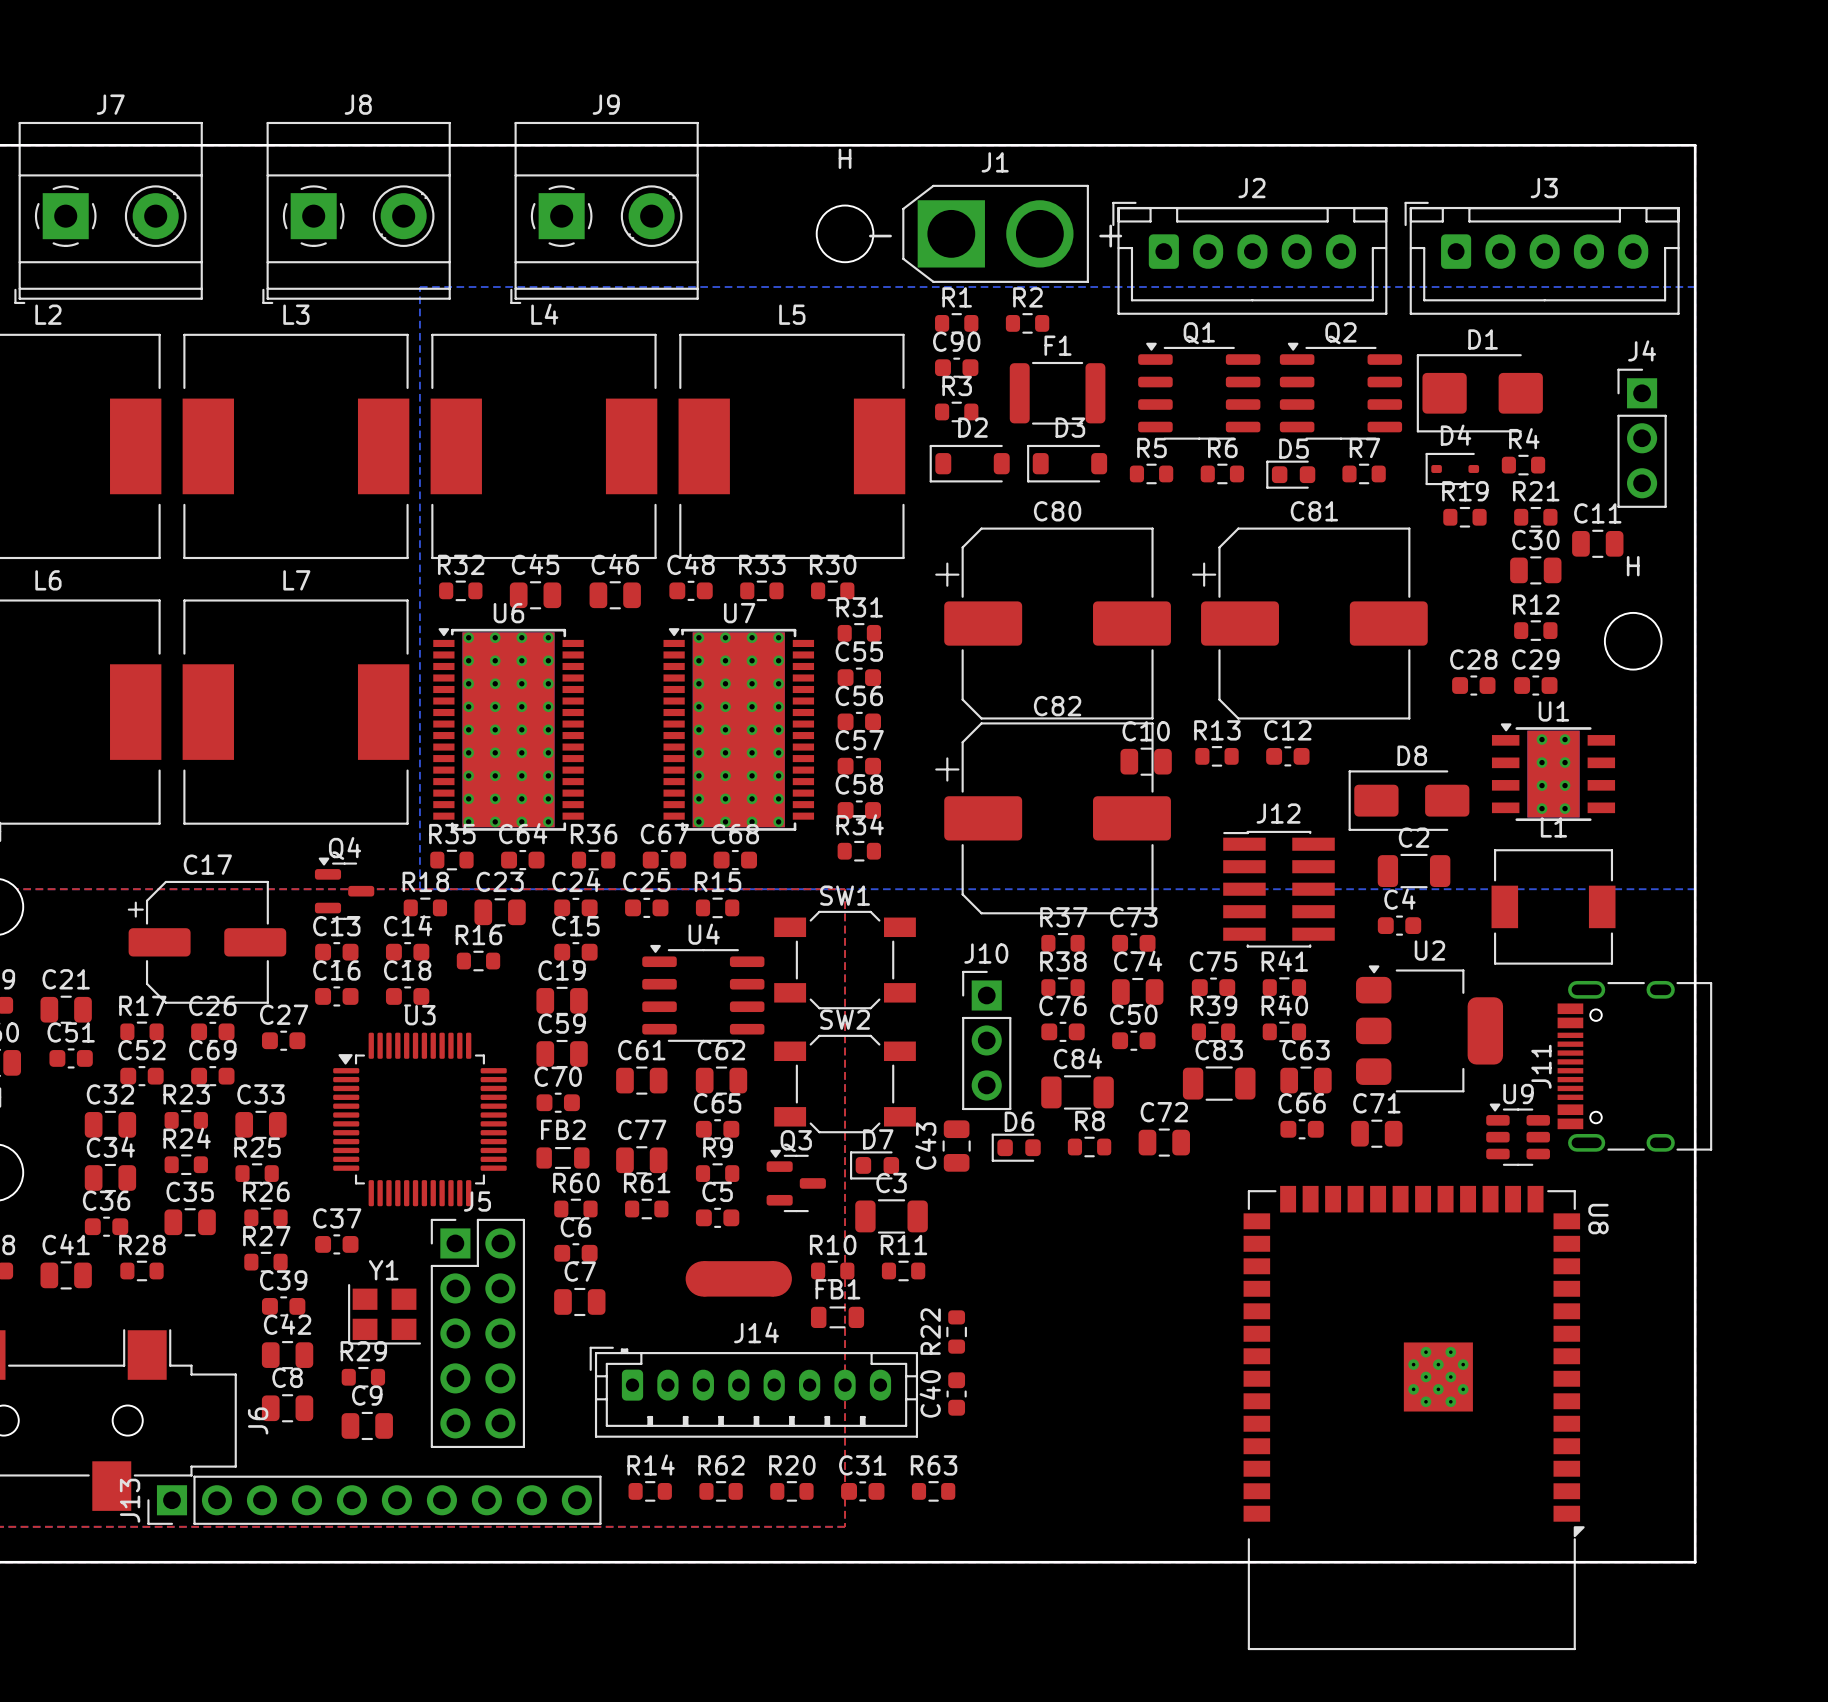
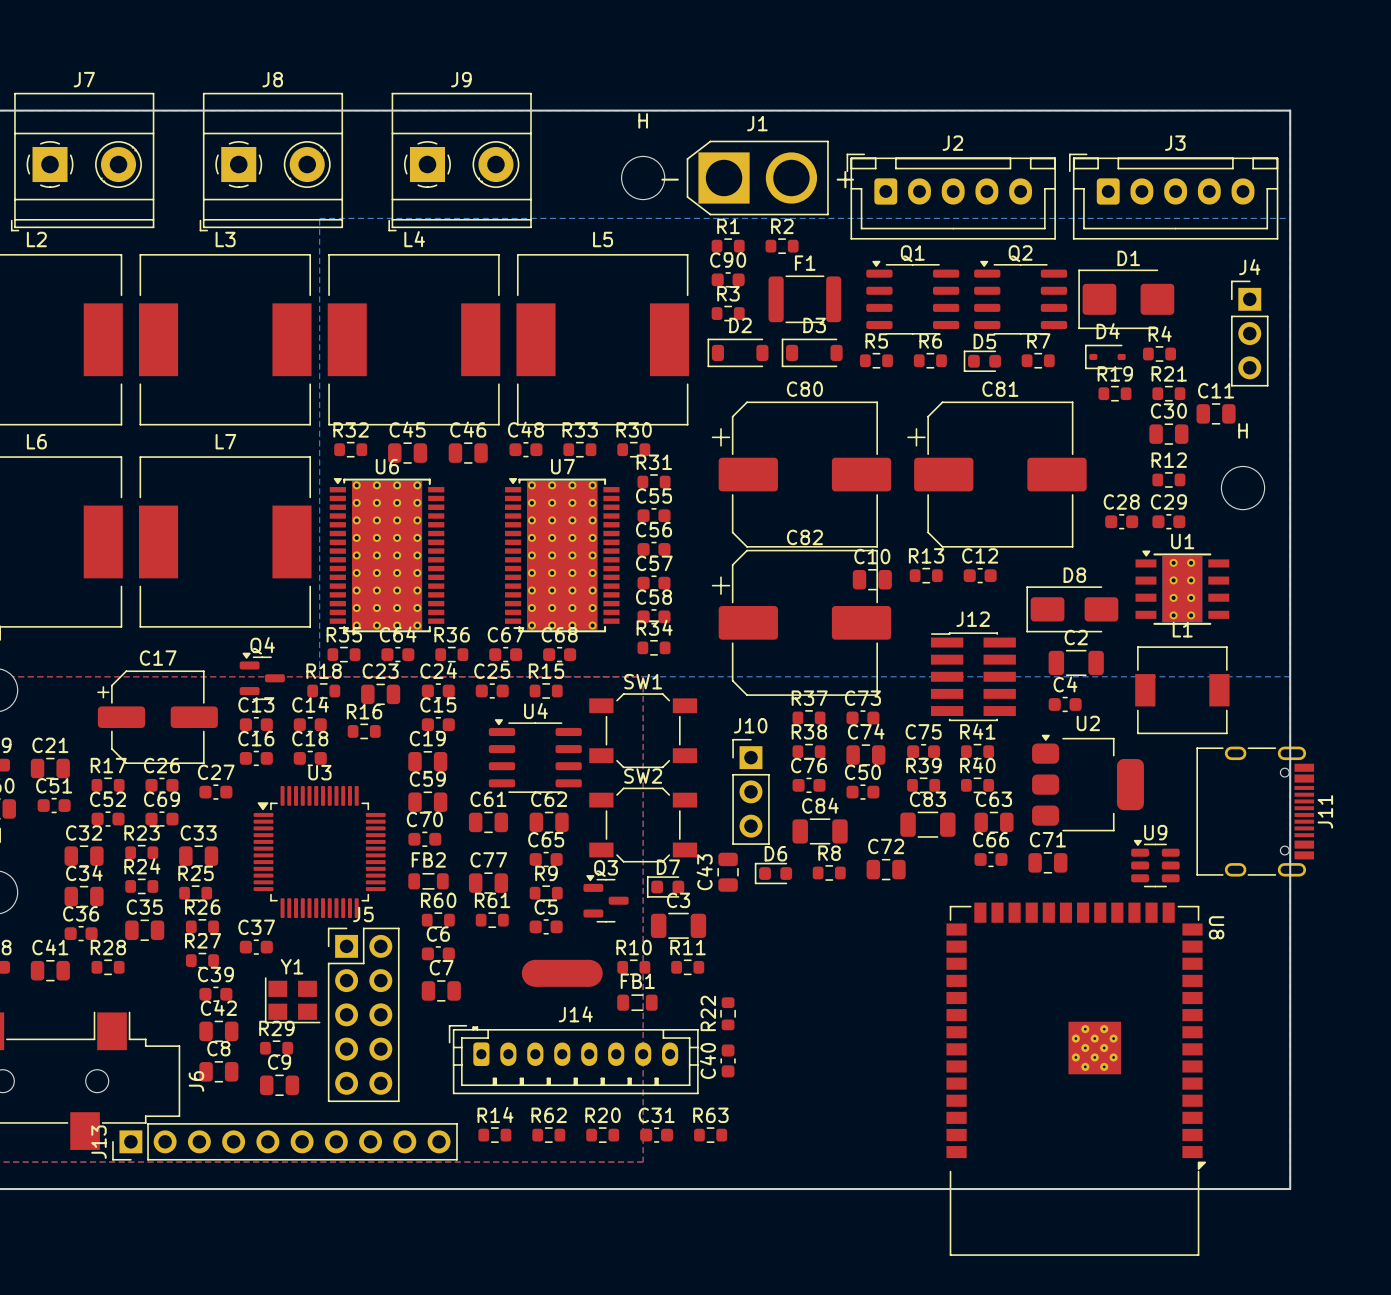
J11 rotation: 0° (1634, 1066) -> 180° (1255, 811)

